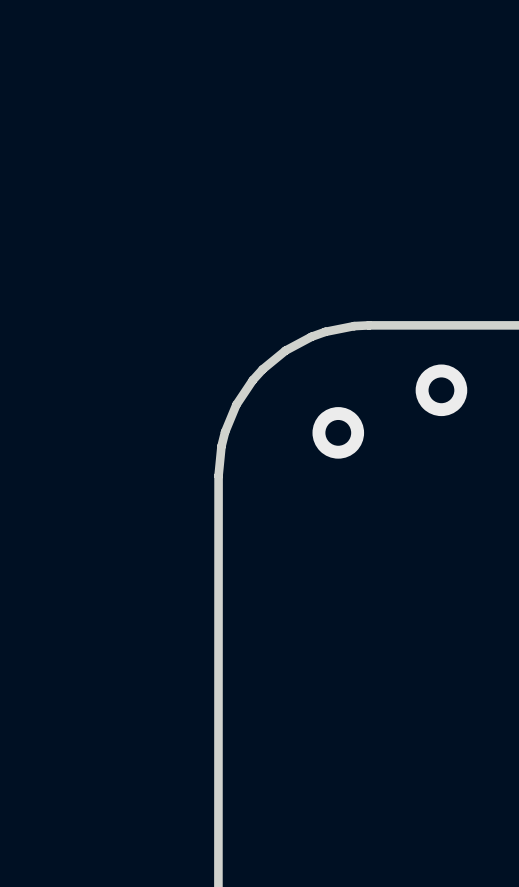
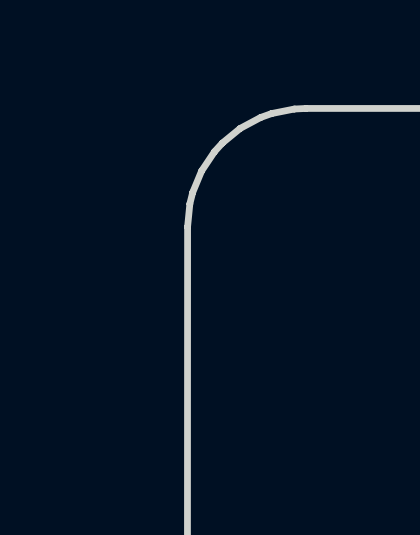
via: (441, 390) -> none
via: (338, 432) -> none

